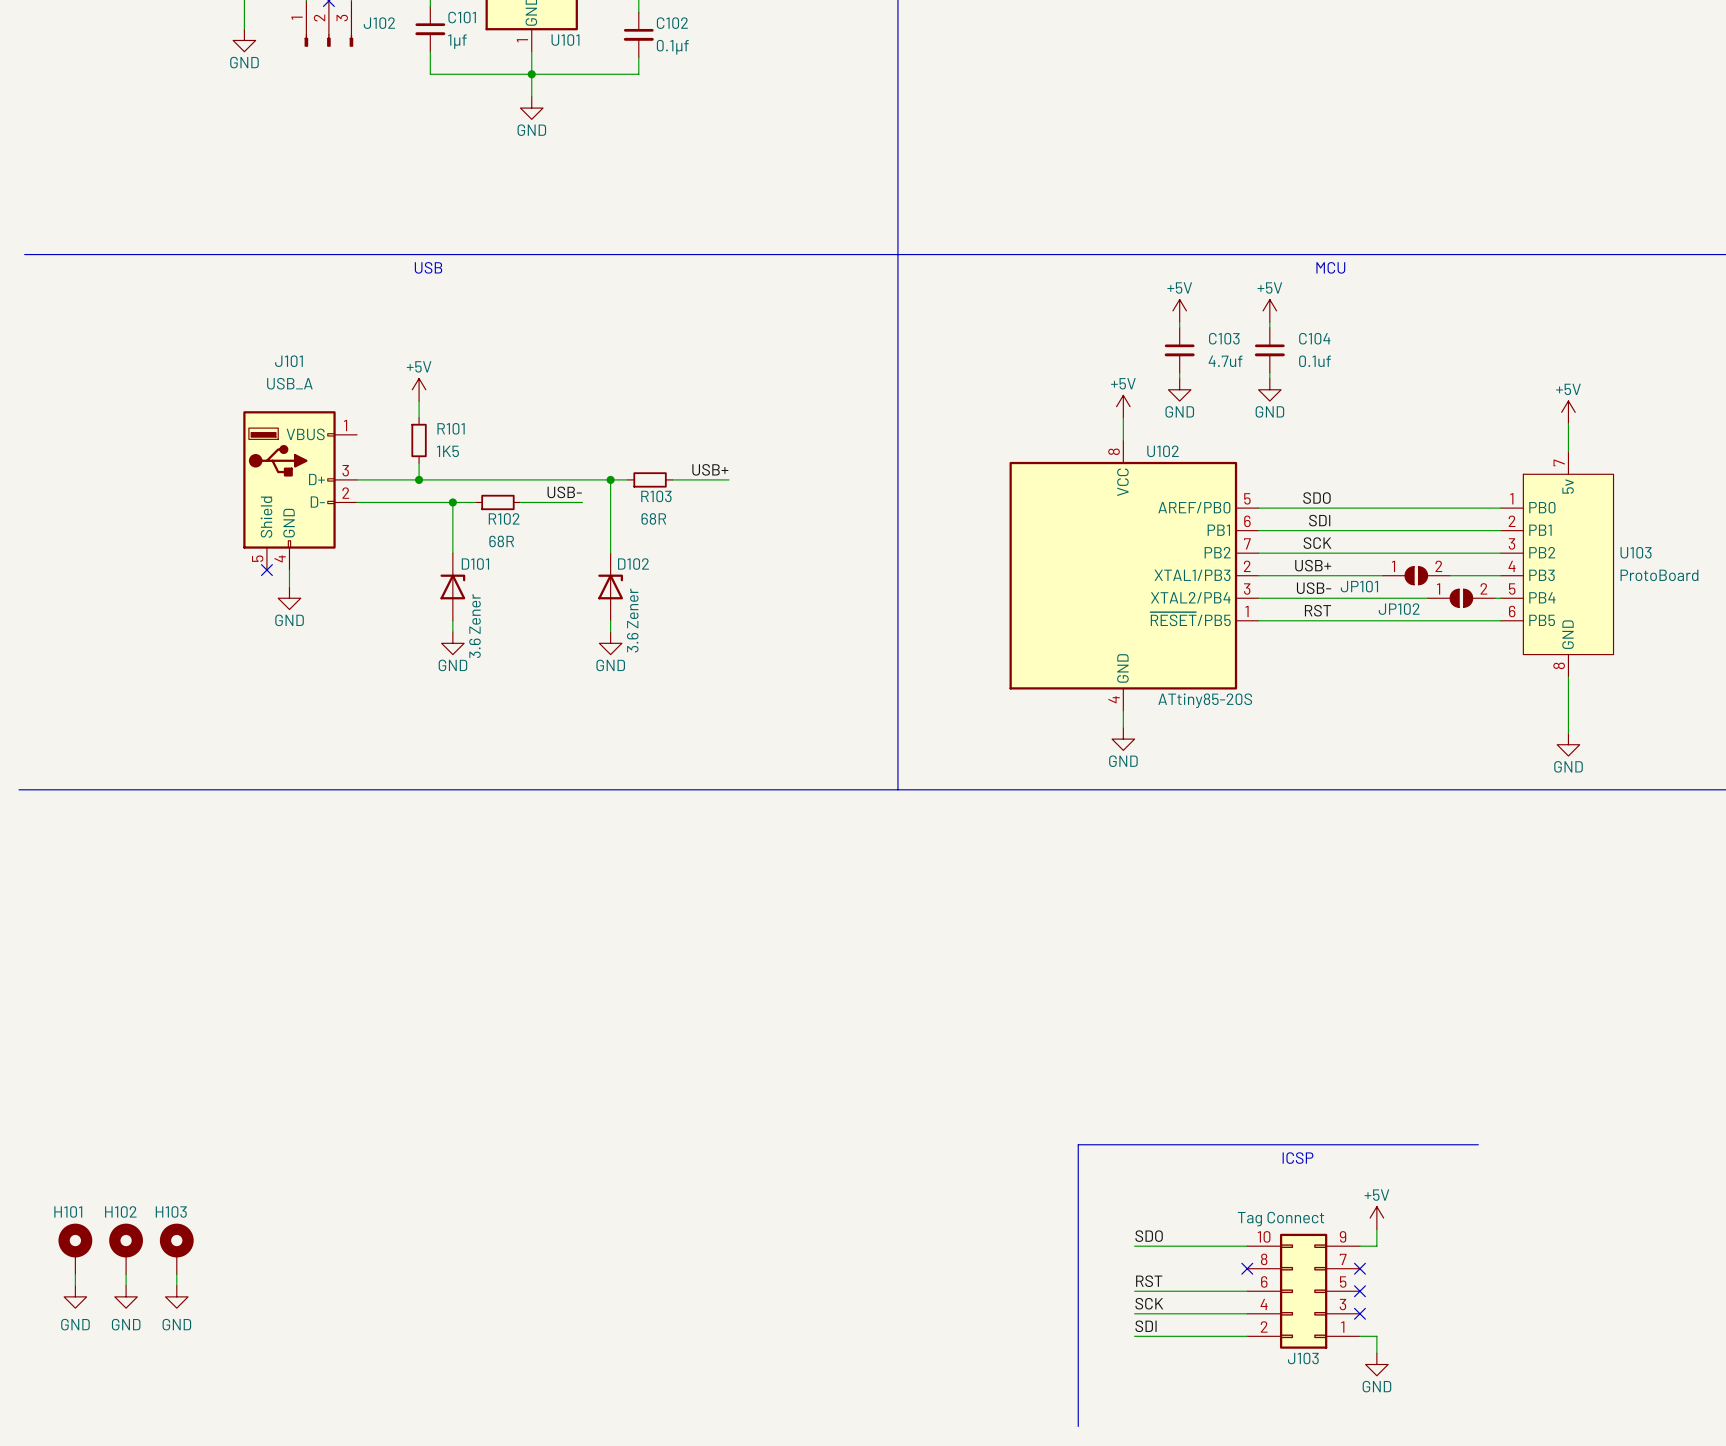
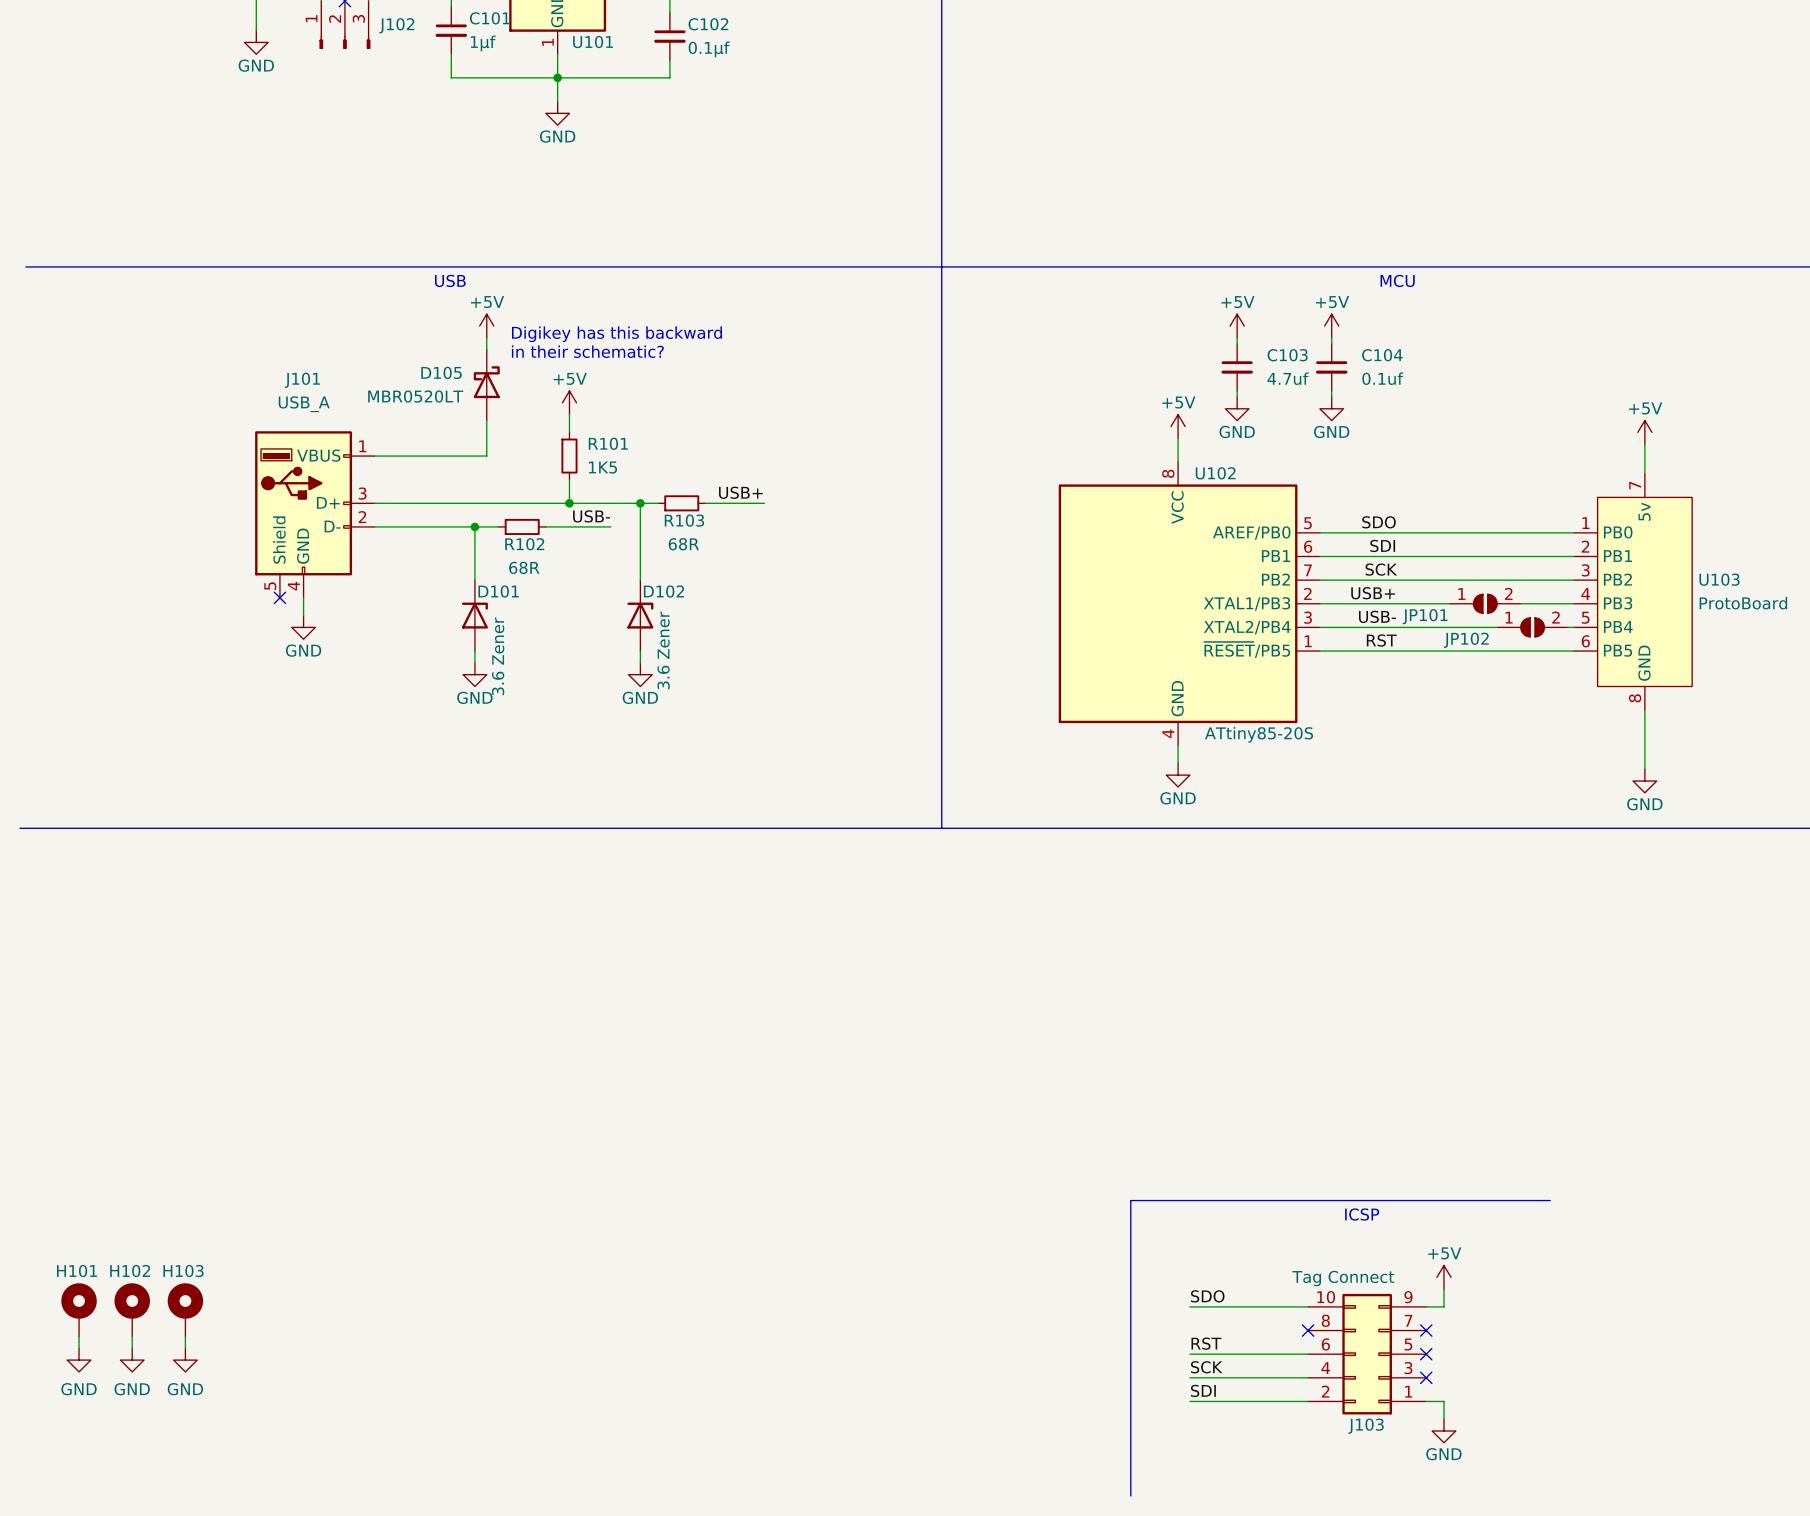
power symbol: none -> +5V (486, 326)
text: none -> Digikey has this backward (616, 334)
wire: none -> (486, 337) (486, 349)
text: none -> in their schematic? (587, 351)
D105: none -> MBR0520LT (486, 385)
power symbol: none -> +5V (569, 402)
power symbol: +5V (419, 389) -> none
wire: (419, 401) (419, 417) -> (569, 414) (569, 432)
wire: none -> (486, 420) (486, 456) (374, 456)
R101 position: (419, 440) -> (569, 456)
wire: none -> (569, 479) (569, 503)
wire: (419, 463) (419, 479) -> none
junction: (419, 479) -> none
junction: none -> (569, 503)

